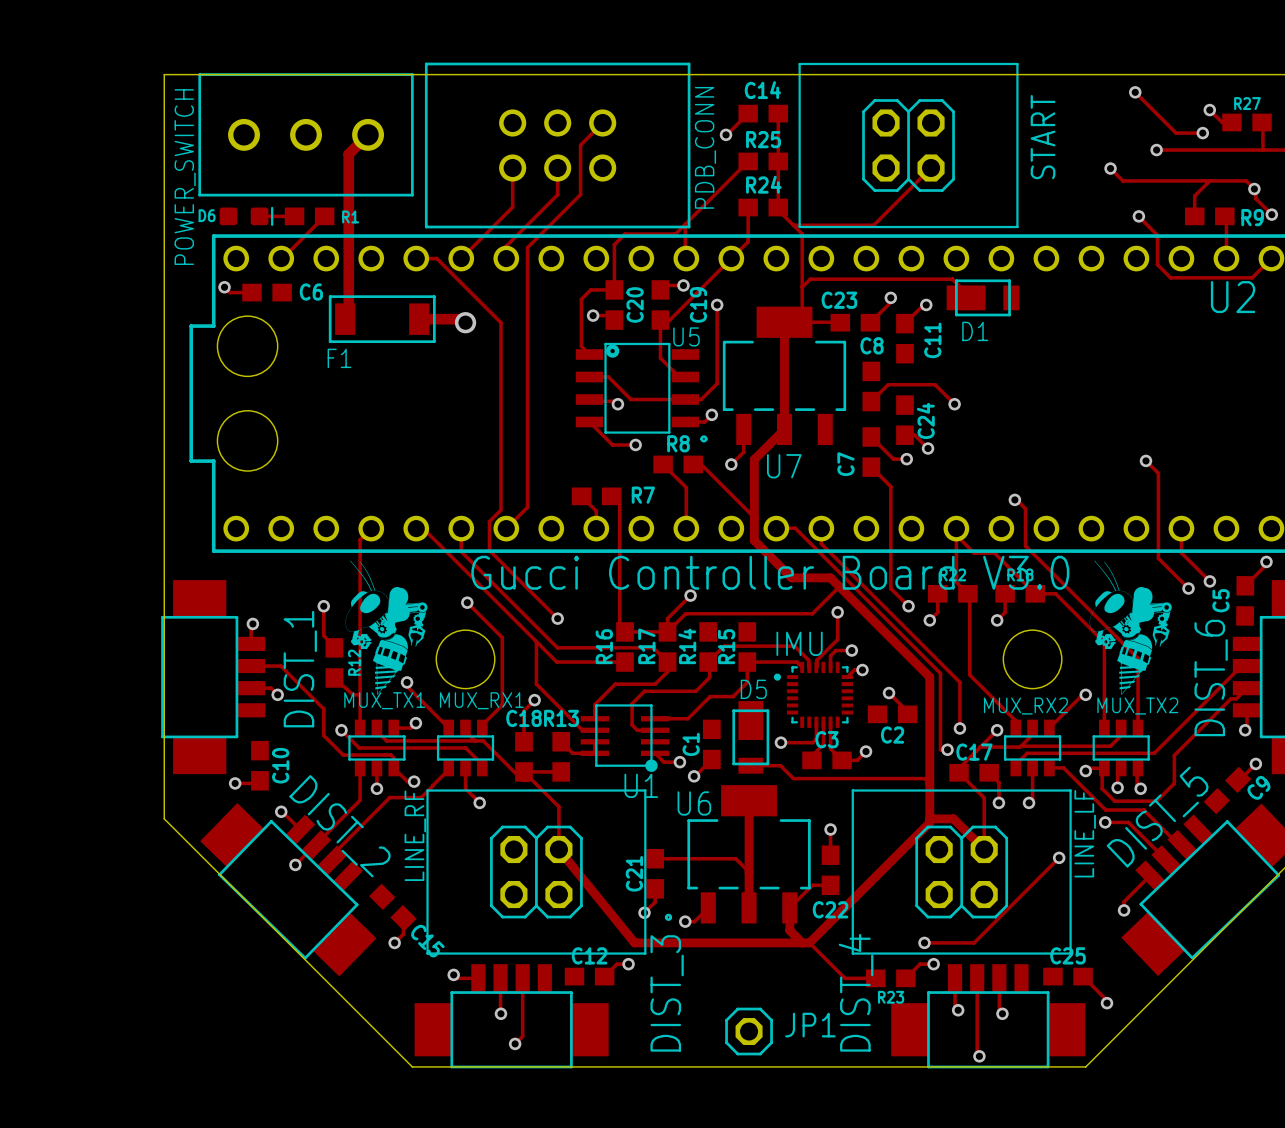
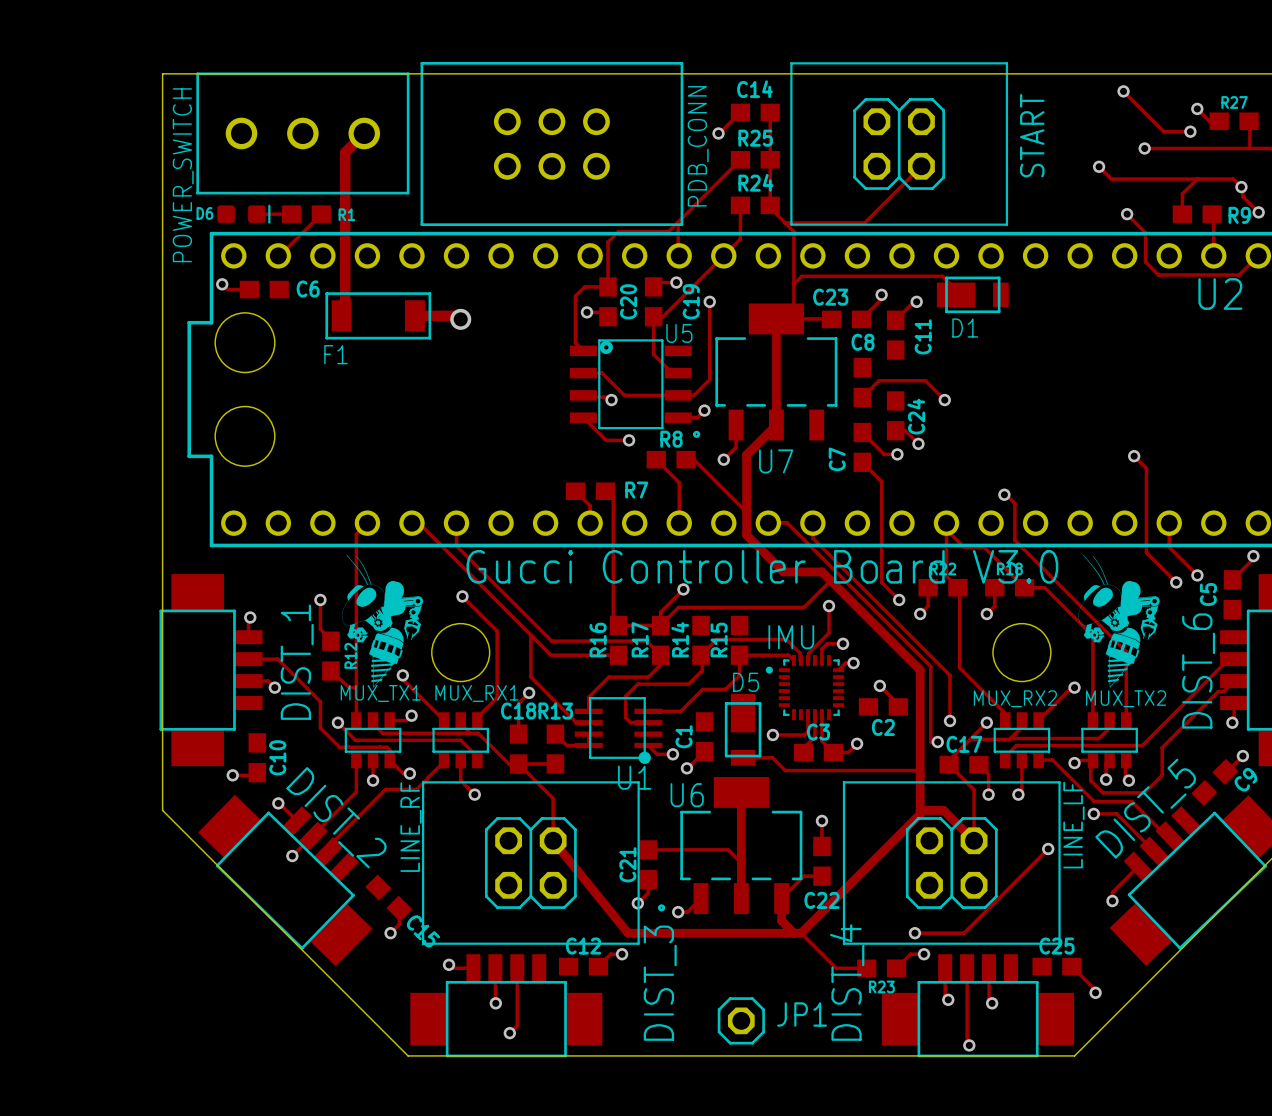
track: (602, 122) (580, 145) (580, 194) (527, 247) (527, 507) (506, 528) -> none
track: (512, 168) (512, 207) (461, 258) -> none
track: (557, 168) (557, 194) (506, 246) (506, 258) -> none
track: (416, 258) (436, 258) (500, 322) (500, 510) (489, 521) (489, 550) (557, 618) -> none
via: (557, 618) -> none

